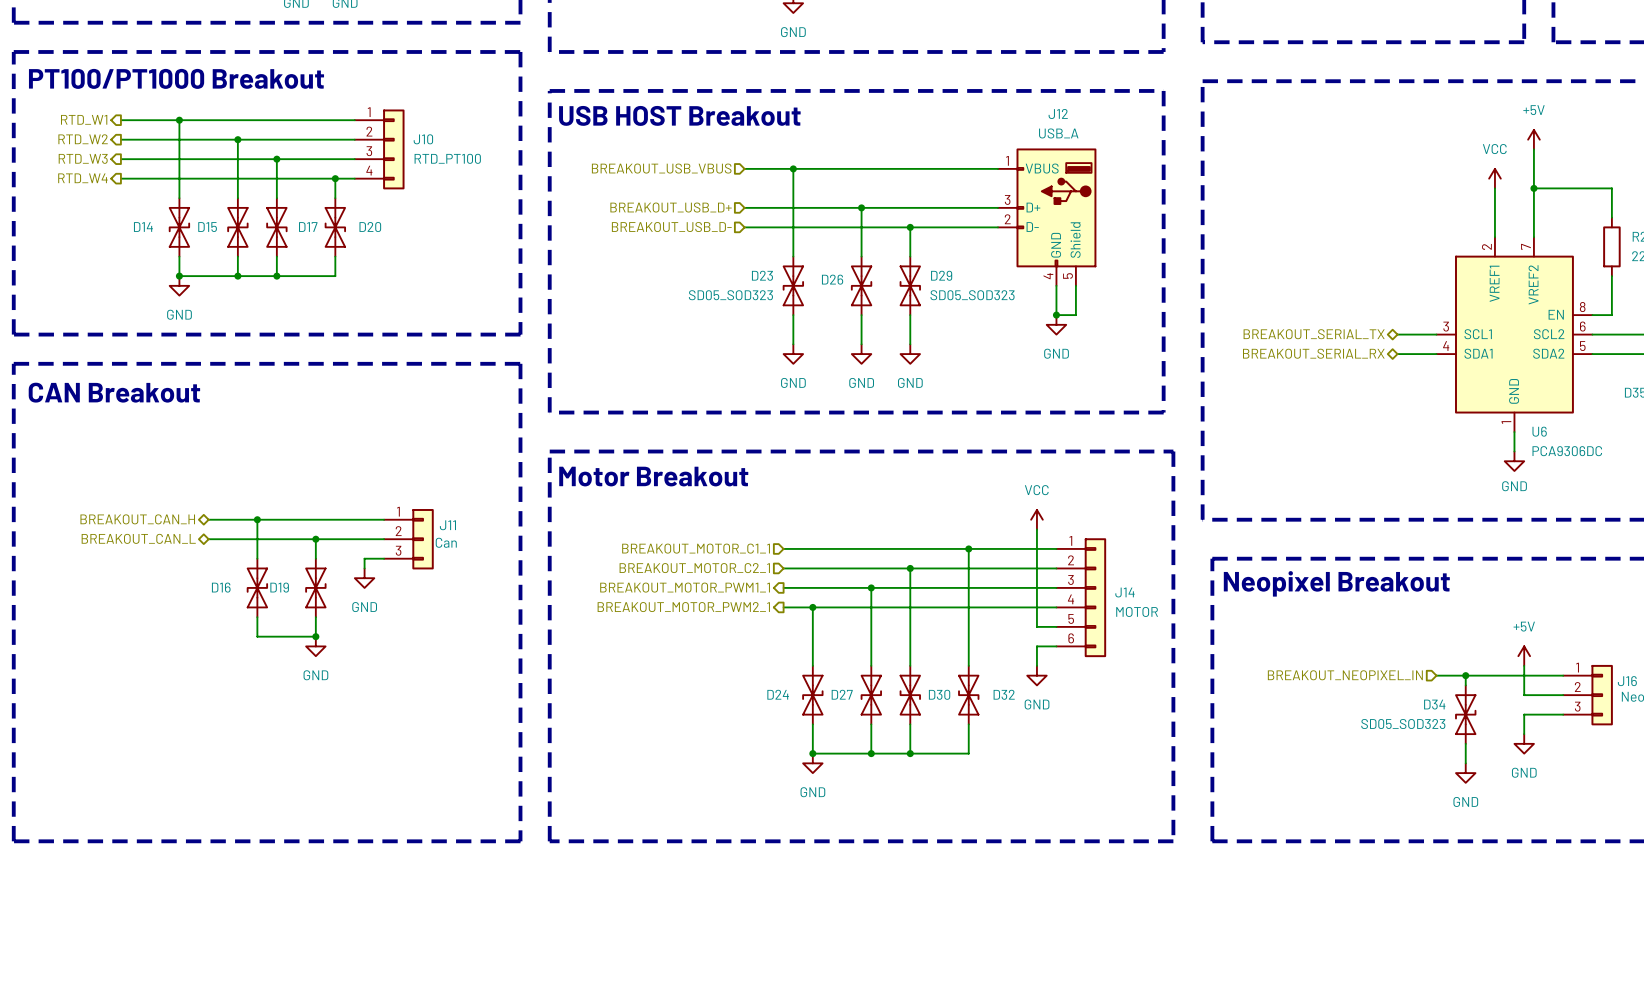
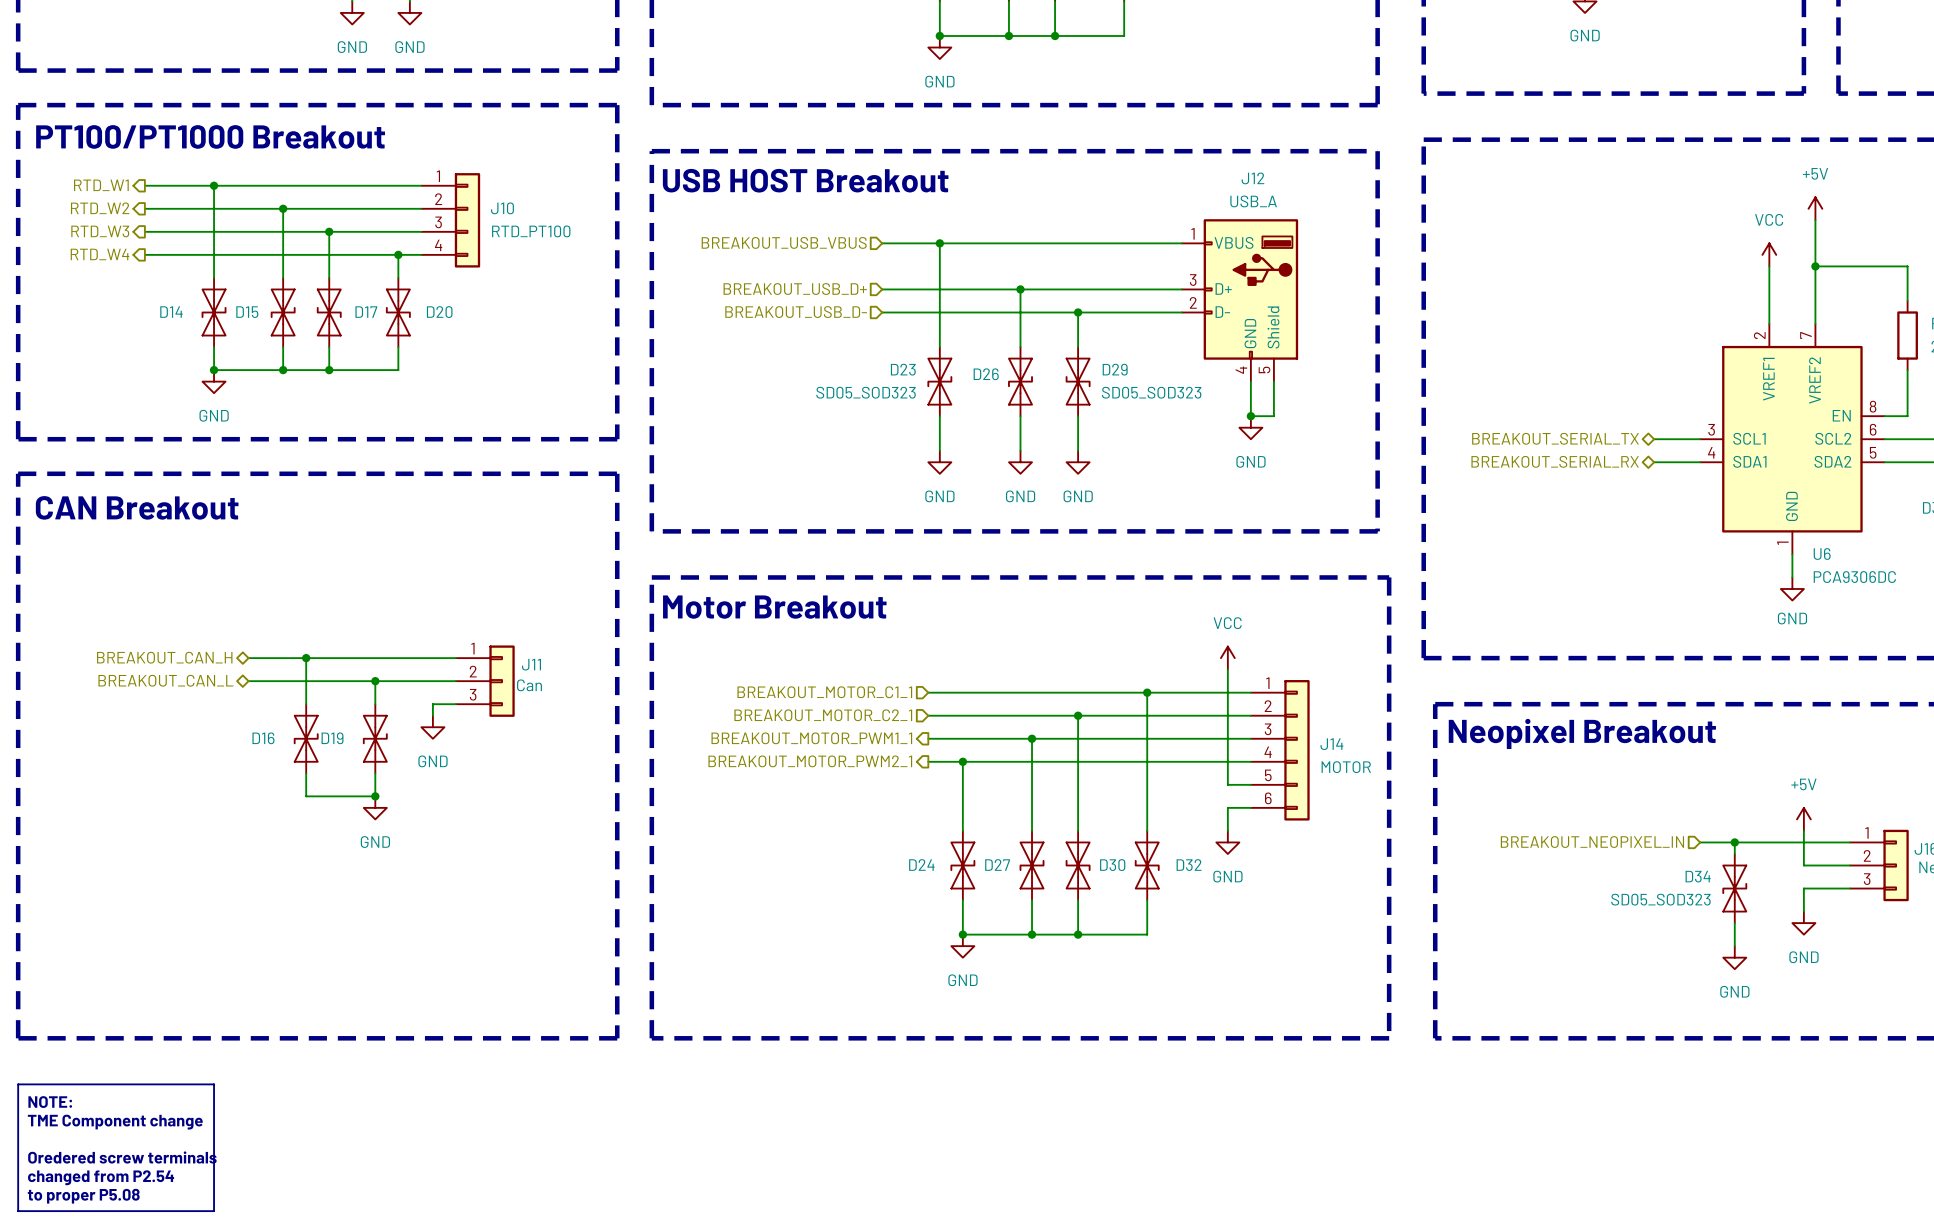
line: none -> (18, 1084) (214, 1084) (214, 1211) (18, 1211) (18, 1084)
text: none -> NOTE: (50, 1102)
text: none -> TME Component change (115, 1122)
text: none -> Oredered screw terminals (122, 1157)
text: none -> changed from P2.54 (101, 1177)
text: none -> to proper P5.08 (83, 1196)

